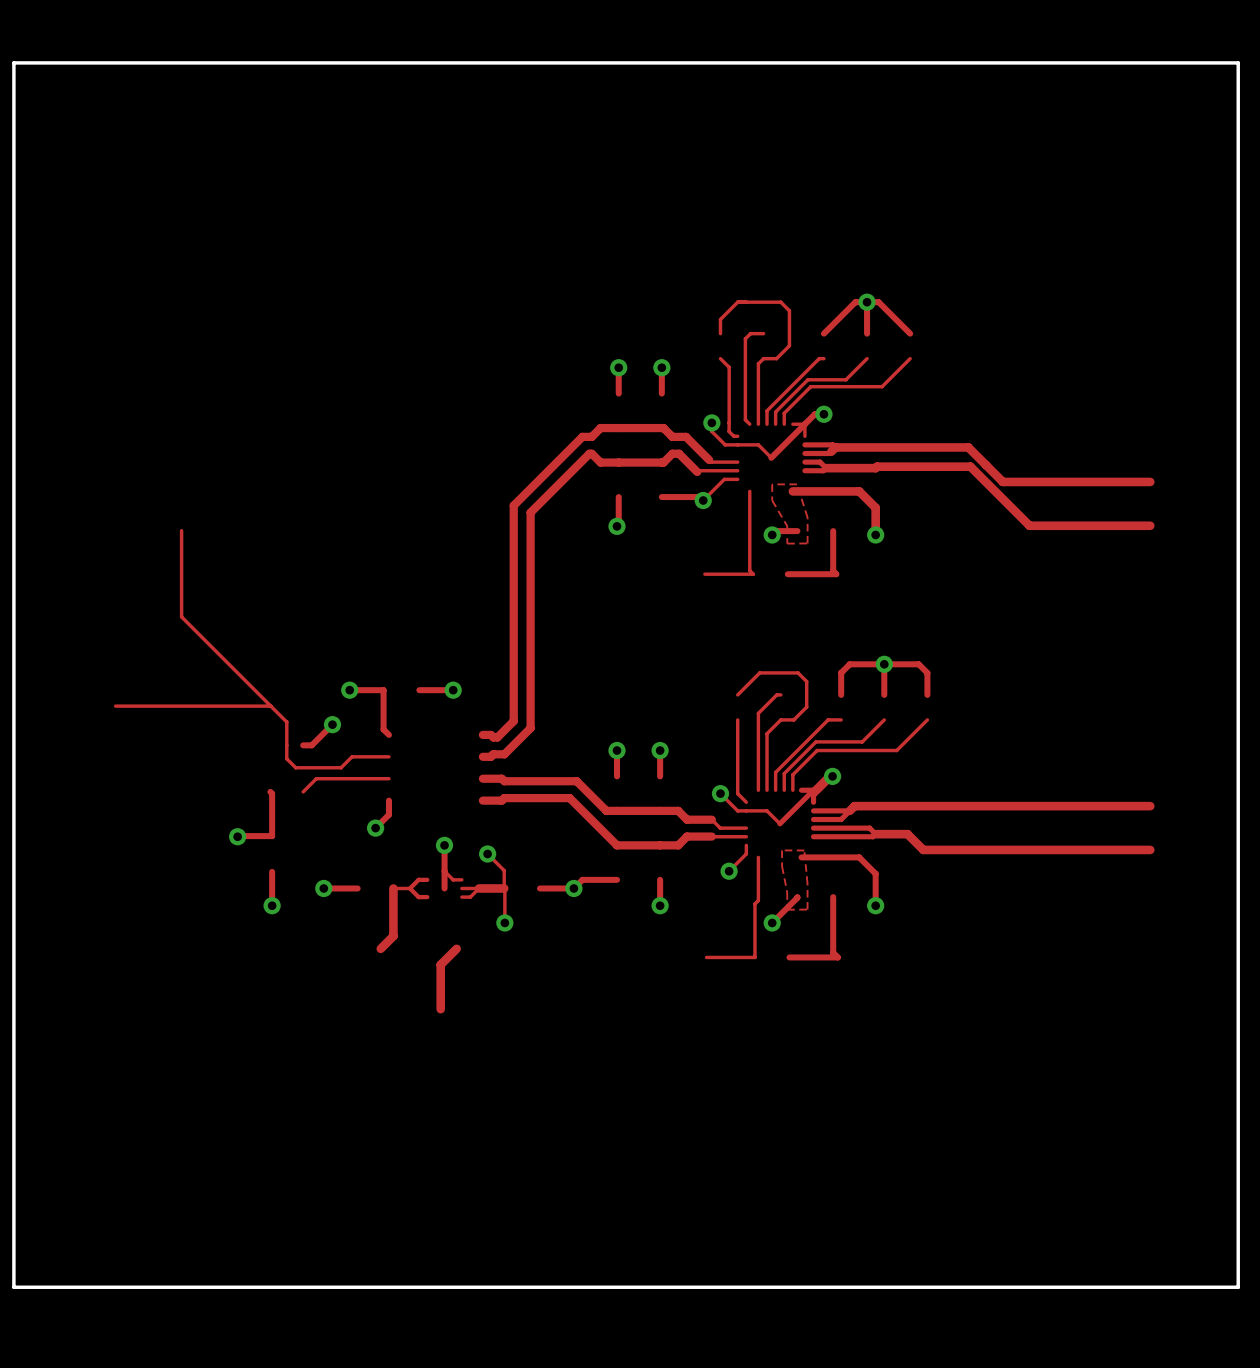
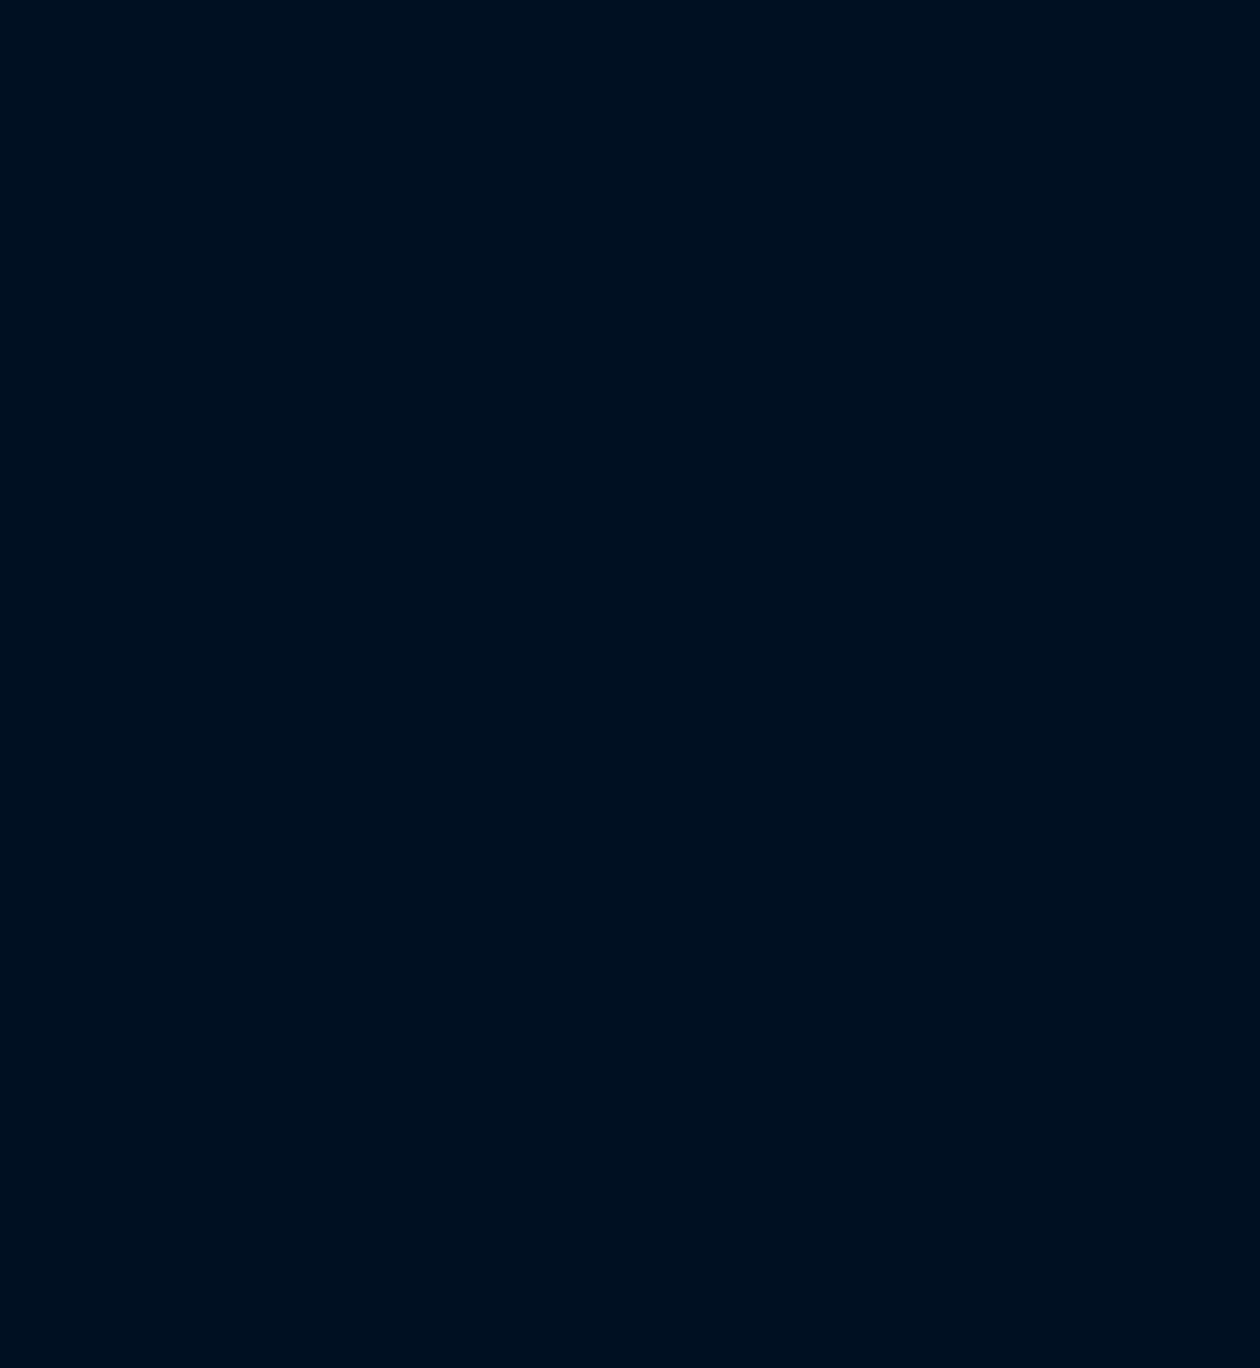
board edge: (1238, 62) (13, 62) (13, 1287) (1238, 1287) (1238, 62) -> none
top track: (867, 302) (867, 333) -> none
via: (867, 302) -> none
top track: (720, 333) (720, 319) (737, 302) (780, 302) (789, 310) (789, 345) (776, 358) (763, 358) (758, 363) (758, 424) -> none
top track: (763, 333) (750, 333) (745, 338) (745, 419) (749, 424) -> none
top track: (910, 333) (878, 302) (855, 302) (823, 333) -> none
top track: (720, 358) (729, 367) (729, 422) -> none
top track: (823, 358) (819, 358) (767, 410) (767, 424) -> none
top track: (867, 358) (845, 379) (807, 379) (775, 412) (775, 424) -> none
top track: (910, 358) (882, 386) (810, 386) (784, 413) (784, 424) -> none
top track: (618, 367) (618, 393) -> none
via: (618, 367) -> none
top track: (661, 367) (661, 393) -> none
via: (661, 367) -> none
top track: (823, 414) (814, 414) (771, 457) (758, 444) (725, 444) (711, 431) (711, 422) -> none
via: (823, 414) -> none
via: (711, 422) -> none
top track: (729, 422) (729, 431) (733, 436) (737, 436) -> none
top track: (792, 424) (804, 424) (804, 436) -> none
top track: (804, 444) (832, 444) (835, 447) -> none
top track: (835, 447) (968, 447) (1002, 481) (1150, 481) -> none
top track: (835, 447) (829, 453) (804, 453) -> none
top track: (737, 462) (711, 462) (686, 436) (672, 436) (663, 428) (600, 428) (591, 436) (582, 436) (513, 505) (513, 721) (497, 737) (482, 734) -> none
top track: (804, 462) (820, 462) (826, 468) -> none
top track: (826, 468) (970, 466) (1029, 525) (1150, 525) -> none
top track: (826, 468) (823, 470) (804, 470) -> none
top track: (737, 470) (697, 471) (679, 453) (672, 453) (663, 462) (600, 462) (589, 453) (530, 512) (530, 728) (504, 754) (482, 756) -> none
top track: (737, 479) (724, 479) (703, 500) (699, 497) (661, 497) -> none
top zone outline: (796, 484) (772, 484) (772, 500) (787, 526) (787, 543) (807, 543) (807, 517) (796, 484) -> none
top track: (749, 491) (749, 570) (753, 574) (704, 574) -> none
top track: (792, 491) (859, 491) (875, 507) (875, 534) -> none
top track: (618, 497) (618, 524) (617, 526) -> none
via: (703, 500) -> none
via: (617, 526) -> none
top track: (181, 530) (181, 616) (286, 722) (286, 758) (295, 767) (341, 767) (352, 756) (388, 756) -> none
top track: (797, 531) (776, 531) (772, 534) -> none
top track: (833, 531) (833, 571) (836, 574) (787, 574) -> none
via: (772, 534) -> none
via: (875, 534) -> none
top track: (884, 664) (884, 694) -> none
via: (884, 664) -> none
top track: (349, 690) (383, 690) (383, 729) (388, 734) -> none
via: (349, 690) -> none
top track: (453, 690) (419, 690) -> none
via: (453, 690) -> none
top track: (737, 694) (759, 672) (798, 672) (806, 681) (806, 707) (793, 719) (780, 719) (767, 733) (767, 790) -> none
top track: (780, 694) (776, 694) (758, 713) (758, 790) -> none
top track: (927, 694) (927, 672) (918, 664) (849, 664) (841, 672) (841, 694) -> none
top track: (270, 706) (115, 706) -> none
top track: (737, 719) (737, 793) (746, 802) -> none
top track: (841, 719) (828, 719) (775, 772) (775, 790) -> none
top track: (884, 719) (862, 741) (815, 741) (784, 773) (784, 790) -> none
top track: (927, 719) (896, 750) (817, 750) (792, 774) (792, 790) -> none
top track: (332, 724) (311, 745) (303, 745) -> none
via: (332, 724) -> none
top track: (617, 750) (617, 776) -> none
via: (617, 750) -> none
top track: (660, 750) (660, 776) -> none
via: (660, 750) -> none
via: (832, 776) -> none
top track: (388, 778) (316, 778) (303, 791) -> none
top track: (482, 778) (501, 778) (504, 781) (576, 781) (606, 810) (678, 810) (687, 819) (711, 819) (720, 828) (746, 828) -> none
top track: (818, 790) (801, 790) -> none
top track: (270, 791) (272, 793) (272, 836) (237, 836) -> none
top track: (720, 793) (737, 810) (767, 810) (779, 823) (827, 776) (832, 776) (813, 795) (813, 802) -> none
via: (720, 793) -> none
top track: (388, 800) (388, 814) (375, 828) -> none
top track: (482, 800) (501, 800) (504, 798) (569, 798) (617, 845) (678, 845) (687, 836) (711, 836) -> none
top track: (1150, 806) (854, 806) (841, 819) (813, 819) -> none
top track: (849, 810) (813, 810) -> none
via: (375, 828) -> none
top track: (813, 828) (869, 828) (875, 834) -> none
top track: (875, 834) (907, 834) (923, 849) (1150, 849) -> none
top track: (875, 834) (873, 836) (813, 836) -> none
via: (237, 836) -> none
top track: (746, 836) (712, 836) -> none
top track: (444, 845) (444, 888) -> none
via: (444, 845) -> none
top track: (746, 845) (746, 853) (729, 871) -> none
top zone outline: (804, 850) (782, 850) (782, 866) (787, 892) (787, 909) (807, 909) (804, 850) -> none
top track: (487, 853) (504, 870) (504, 888) -> none
via: (487, 853) -> none
top track: (758, 857) (758, 900) (754, 903) (754, 957) (706, 957) -> none
top track: (801, 857) (859, 857) (875, 873) (875, 905) -> none
top track: (272, 871) (272, 905) -> none
top track: (444, 871) (453, 879) (461, 879) -> none
via: (729, 871) -> none
top track: (427, 879) (418, 879) (410, 888) -> none
top track: (617, 879) (582, 879) (573, 888) (540, 888) -> none
top track: (660, 879) (660, 905) -> none
via: (323, 888) -> none
top track: (357, 888) (323, 888) -> none
top track: (410, 888) (418, 897) (427, 897) -> none
top track: (410, 888) (393, 888) (393, 936) (380, 948) -> none
top track: (479, 888) (461, 888) -> none
top track: (479, 888) (470, 897) (461, 897) -> none
top track: (504, 888) (479, 888) -> none
top track: (504, 888) (504, 922) -> none
via: (573, 888) -> none
top track: (797, 897) (772, 922) -> none
top track: (833, 897) (833, 952) (837, 957) (789, 957) -> none
via: (272, 905) -> none
via: (660, 905) -> none
via: (875, 905) -> none
via: (504, 922) -> none
via: (772, 922) -> none
top track: (456, 948) (440, 964) (440, 1009) -> none

